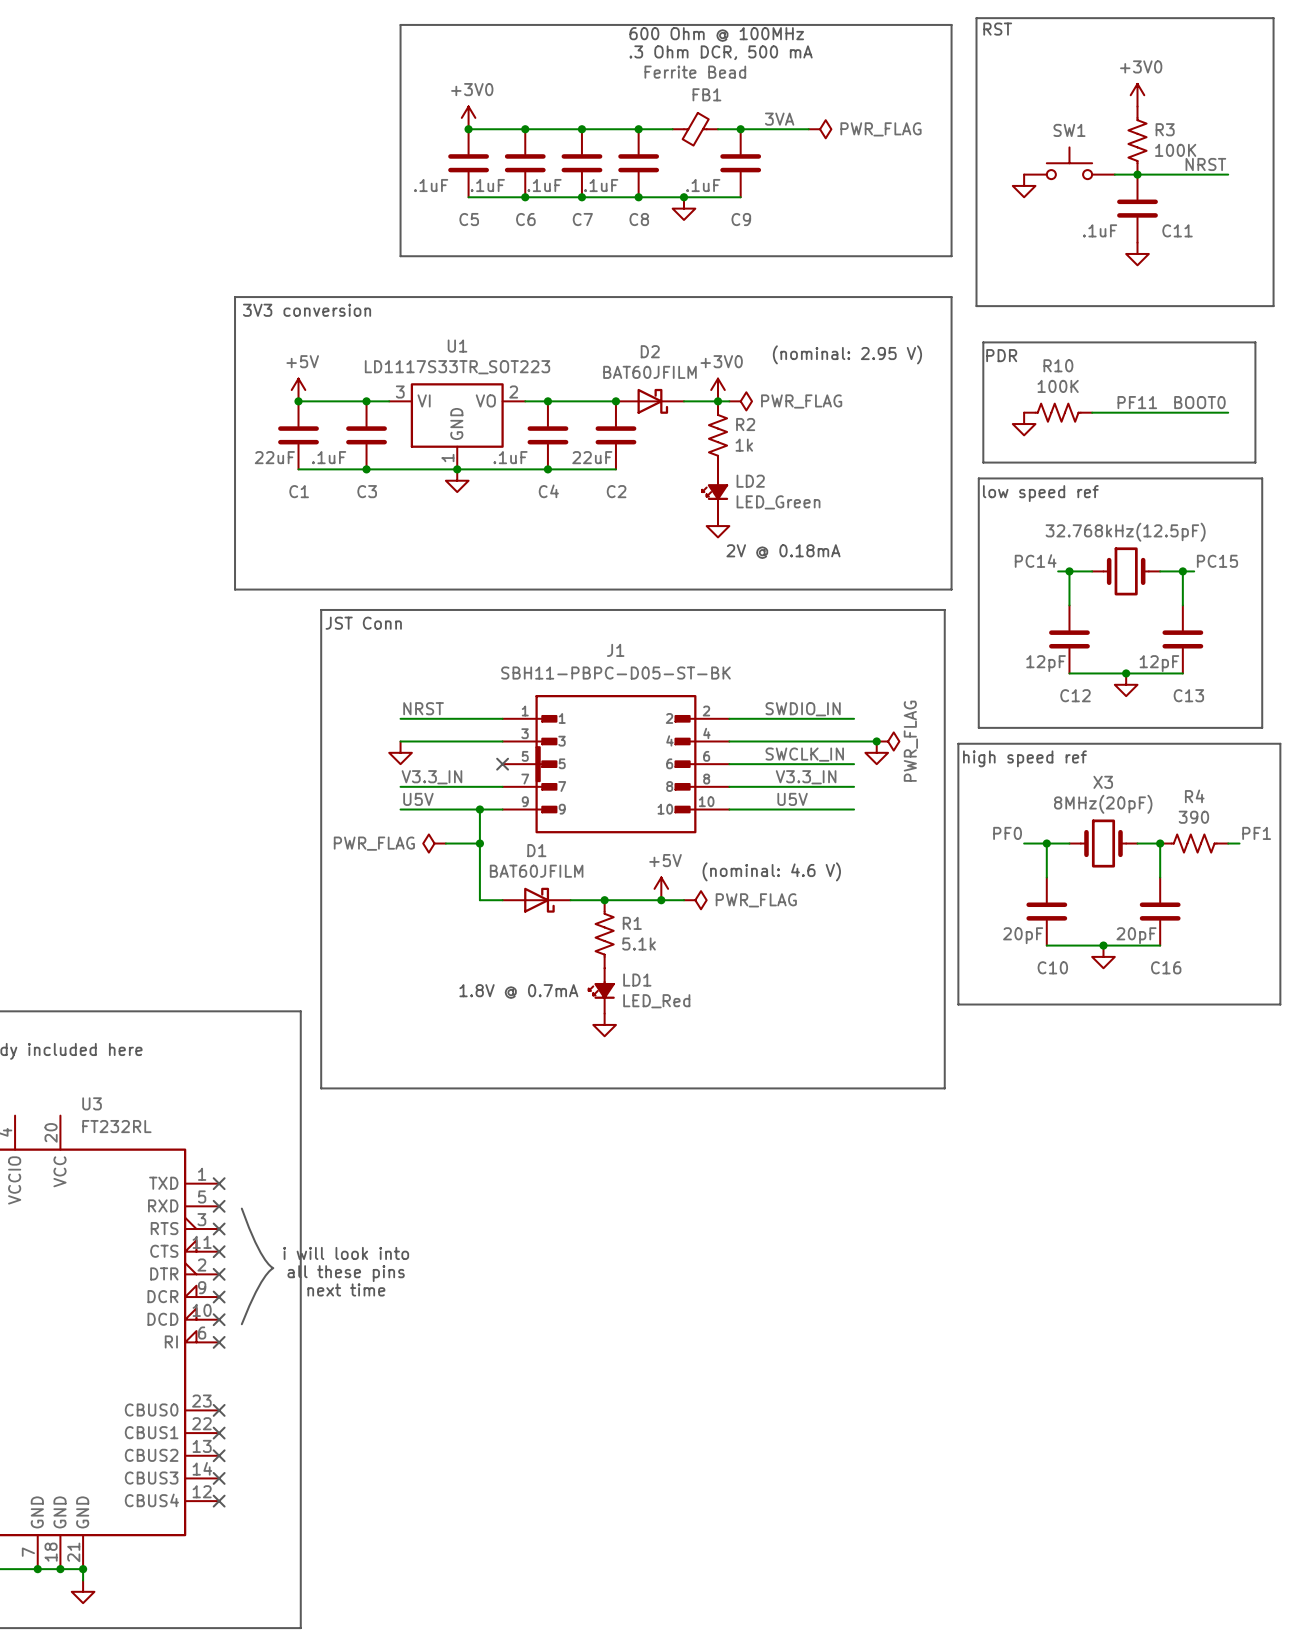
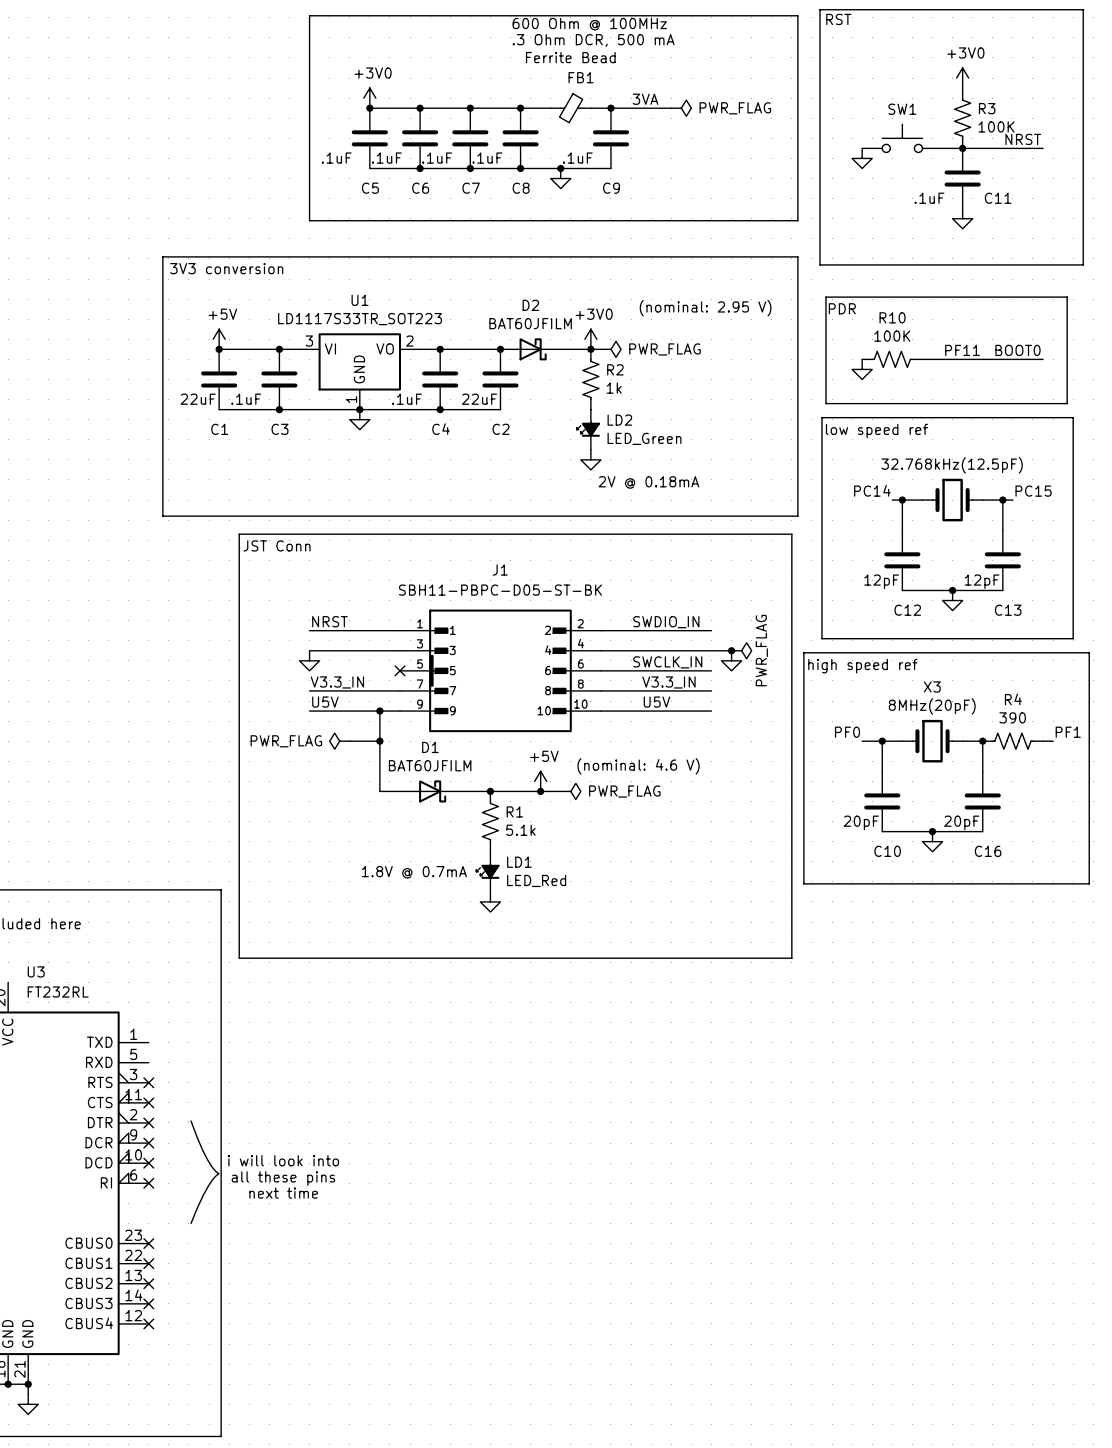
no-connect mark: (219, 1183) -> none
no-connect mark: (219, 1206) -> none
line: (241, 1208) (260, 1252) (273, 1268) (261, 1282) (241, 1324) -> (191, 1120) (207, 1160) (218, 1173) (208, 1186) (191, 1223)
text position: i will look into (346, 1253) -> i will look into (283, 1160)
text position: all these pins (346, 1273) -> all these pins (283, 1178)
text position: next time (346, 1289) -> next time (283, 1193)

